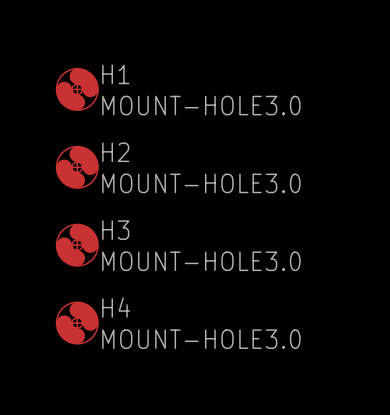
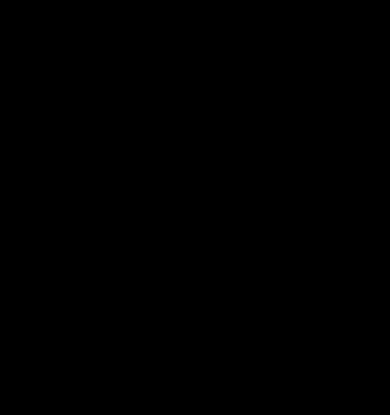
H1: MOUNT-HOLE3.0 (77, 89) -> none
H2: MOUNT-HOLE3.0 (77, 167) -> none
H3: MOUNT-HOLE3.0 (77, 245) -> none
H4: MOUNT-HOLE3.0 (77, 323) -> none

